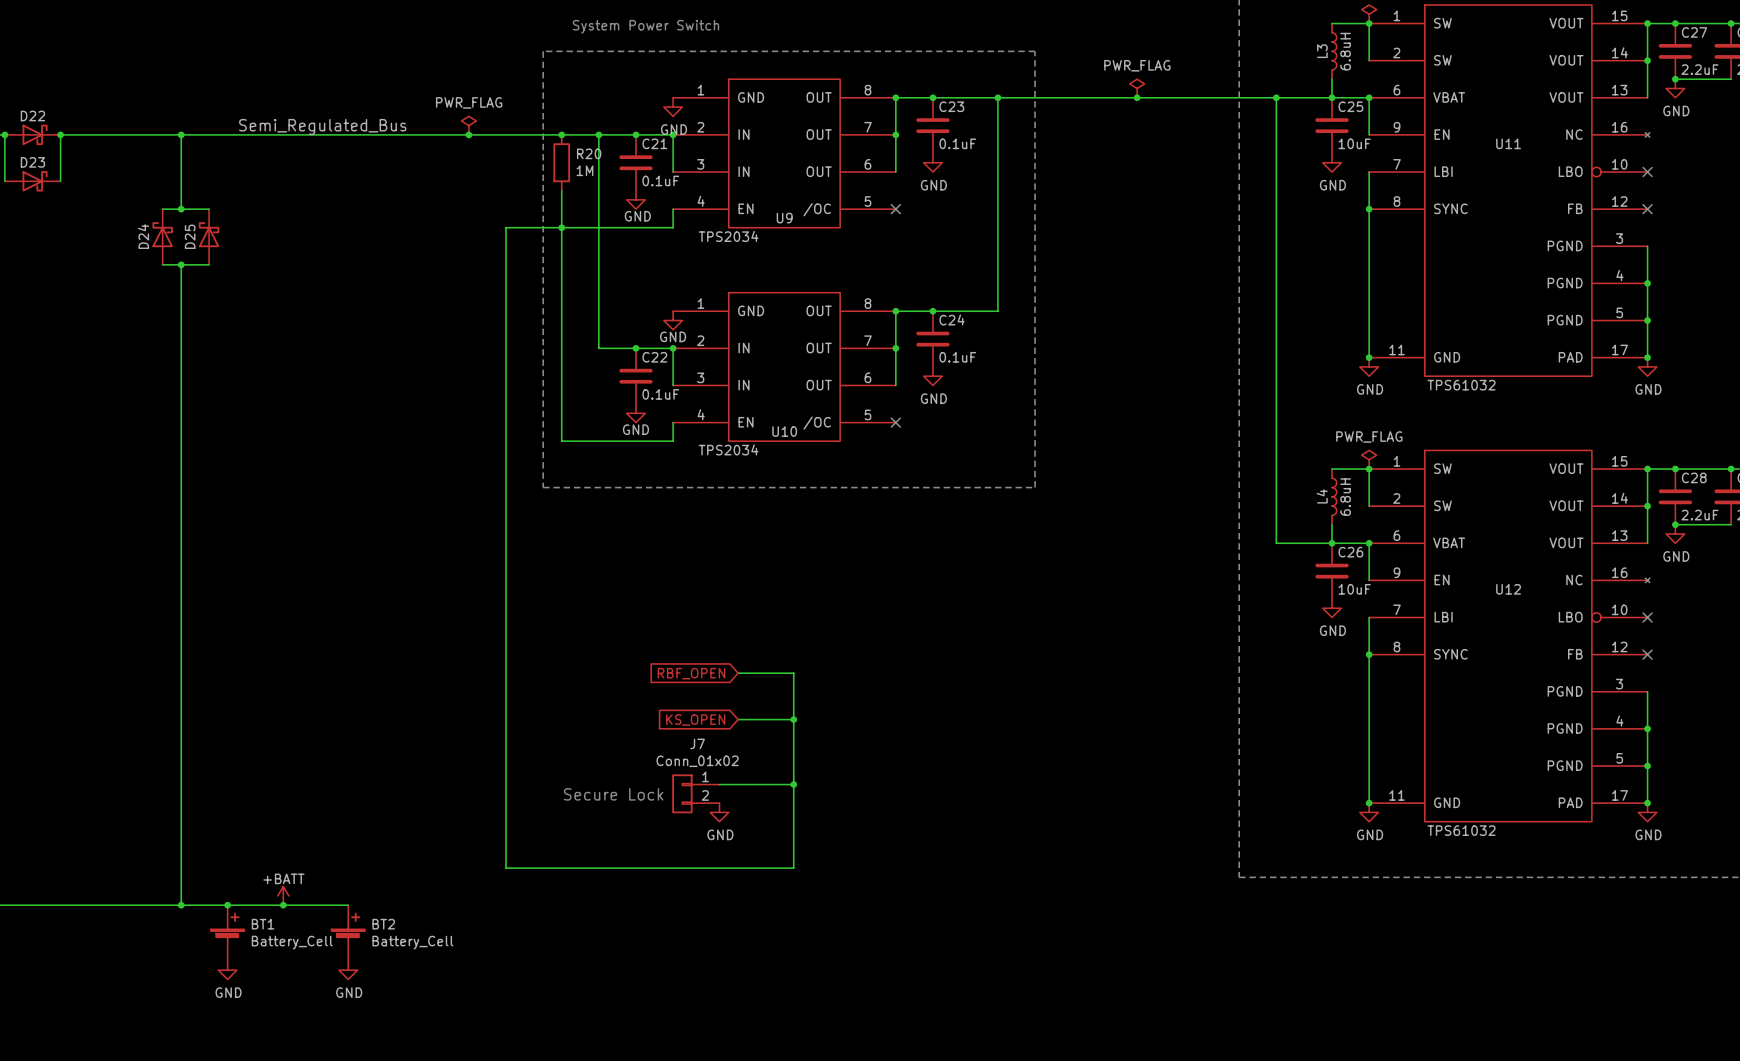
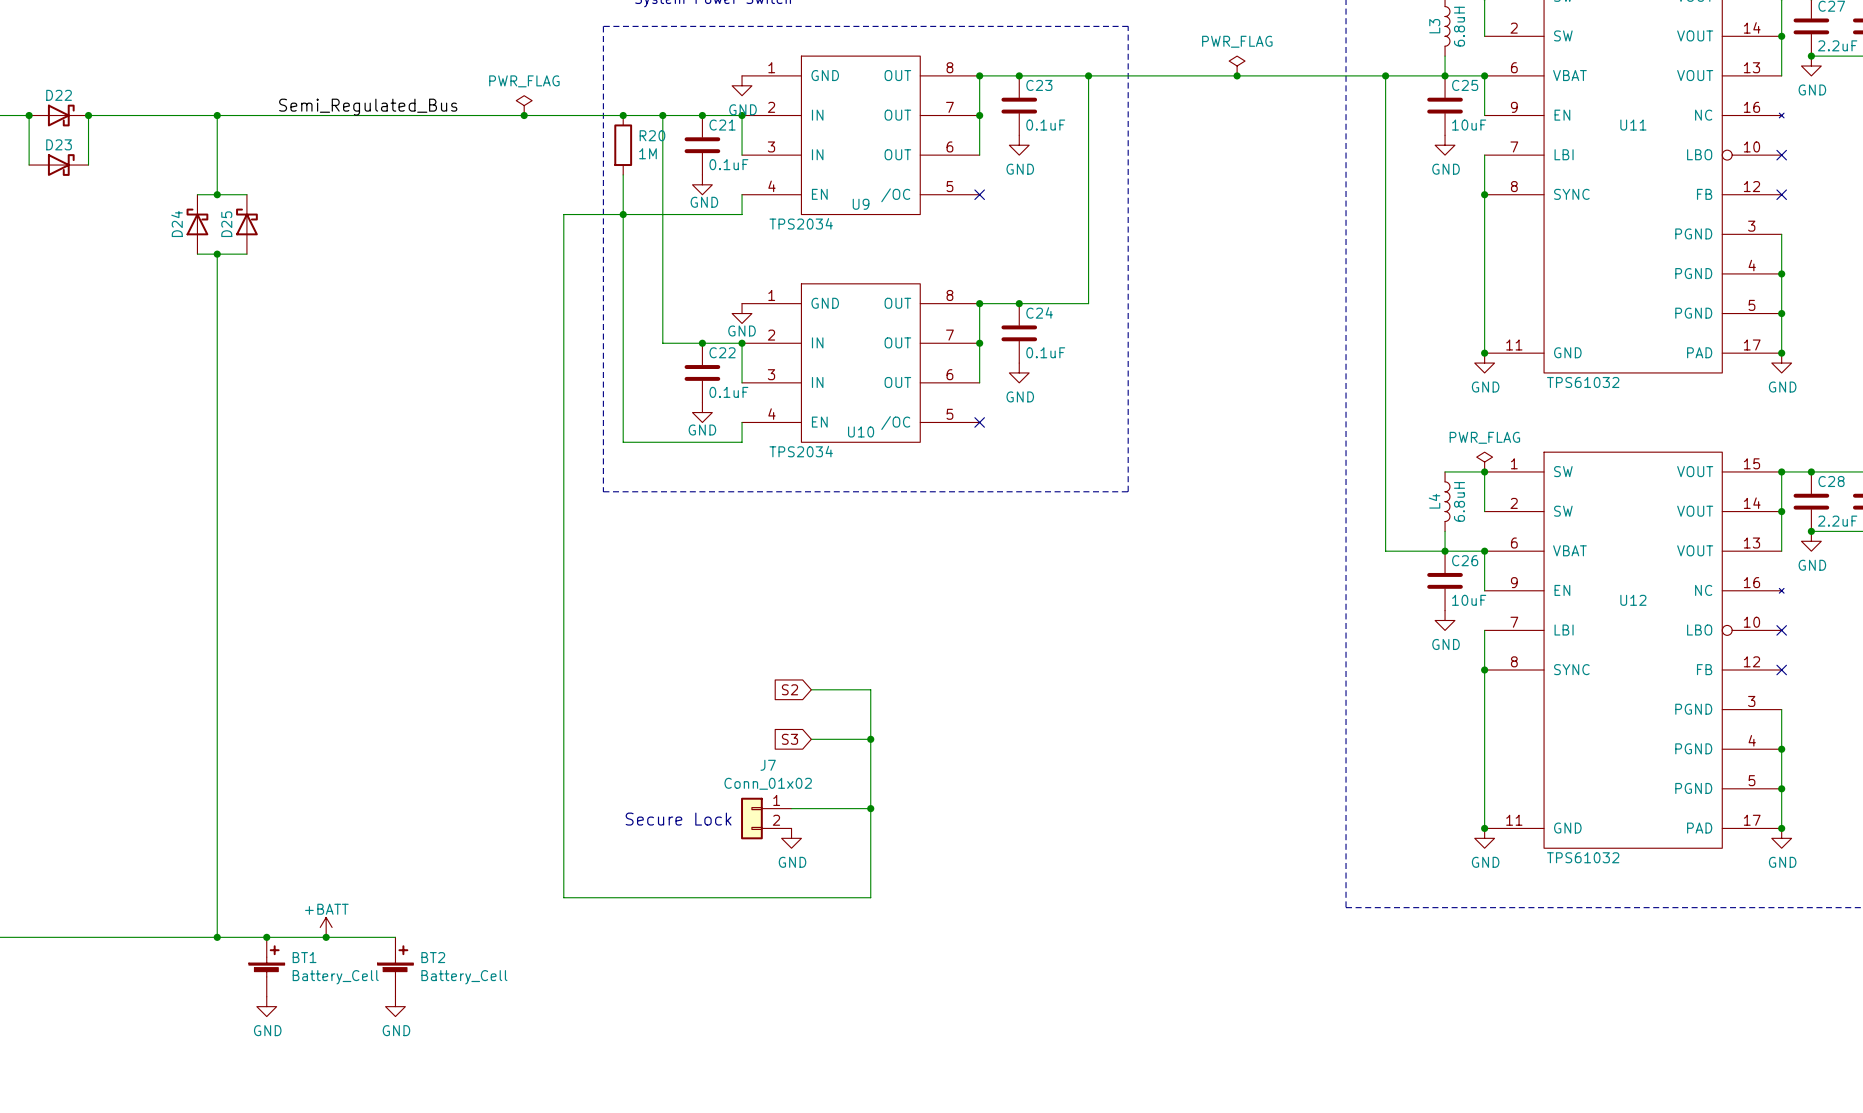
global label: RBF_OPEN (691, 673) -> S2 (789, 689)
global label: KS_OPEN (695, 720) -> S3 (789, 739)

